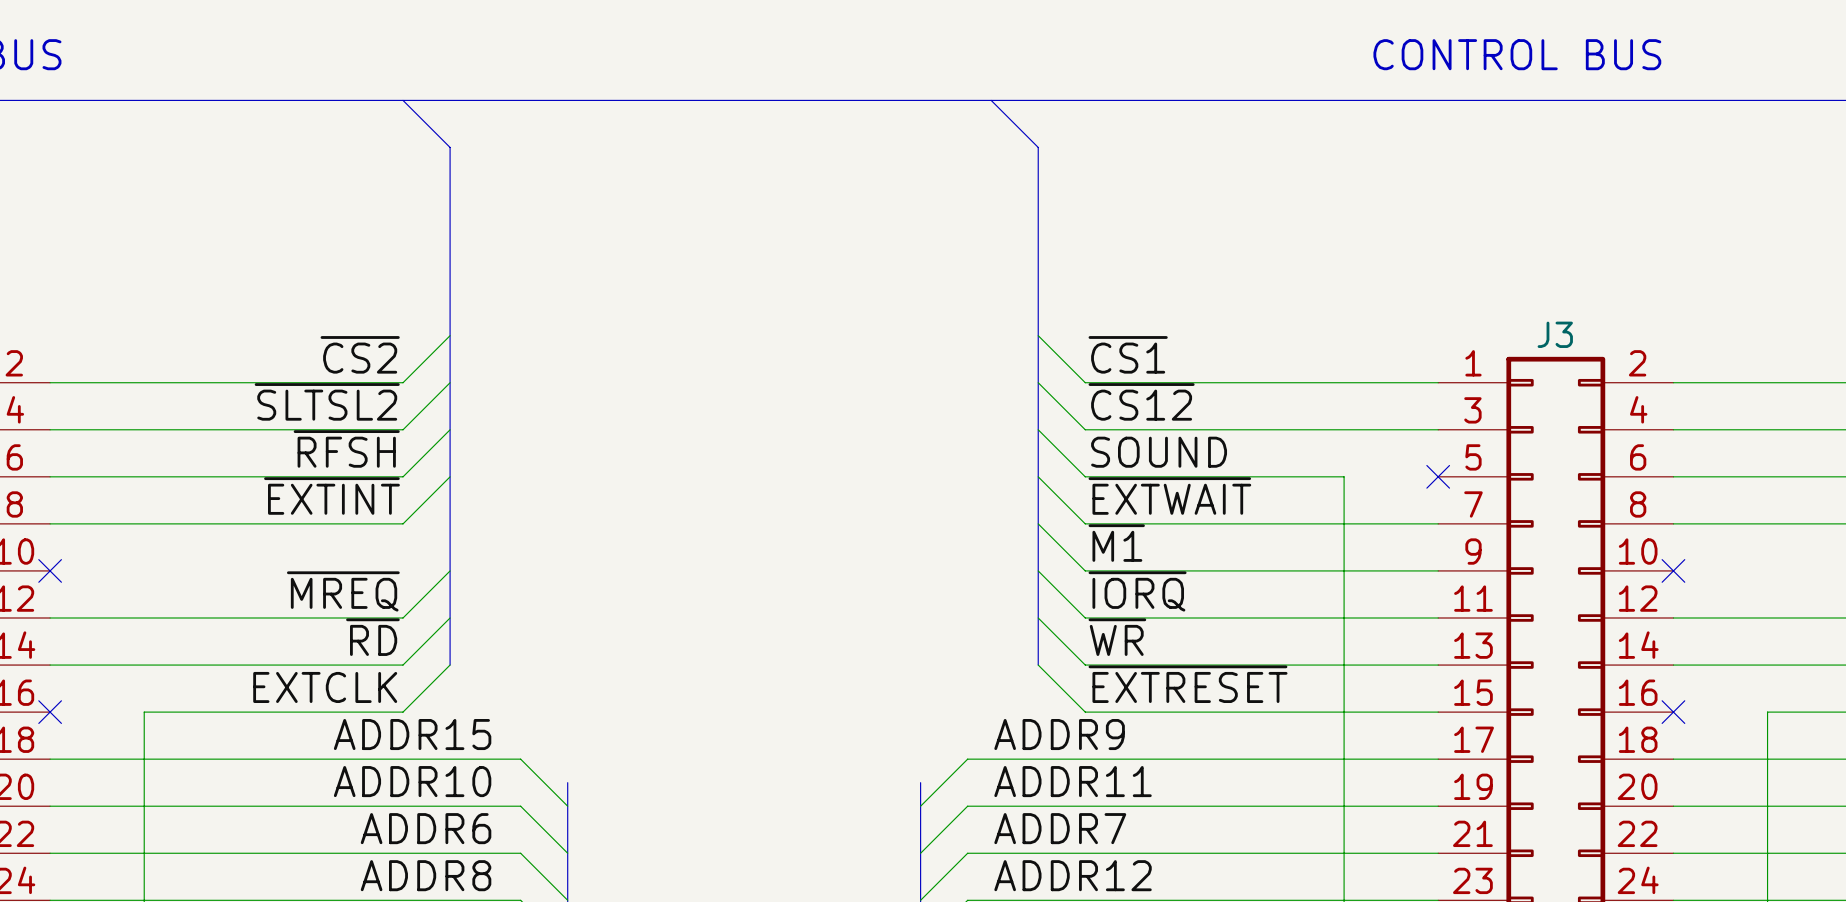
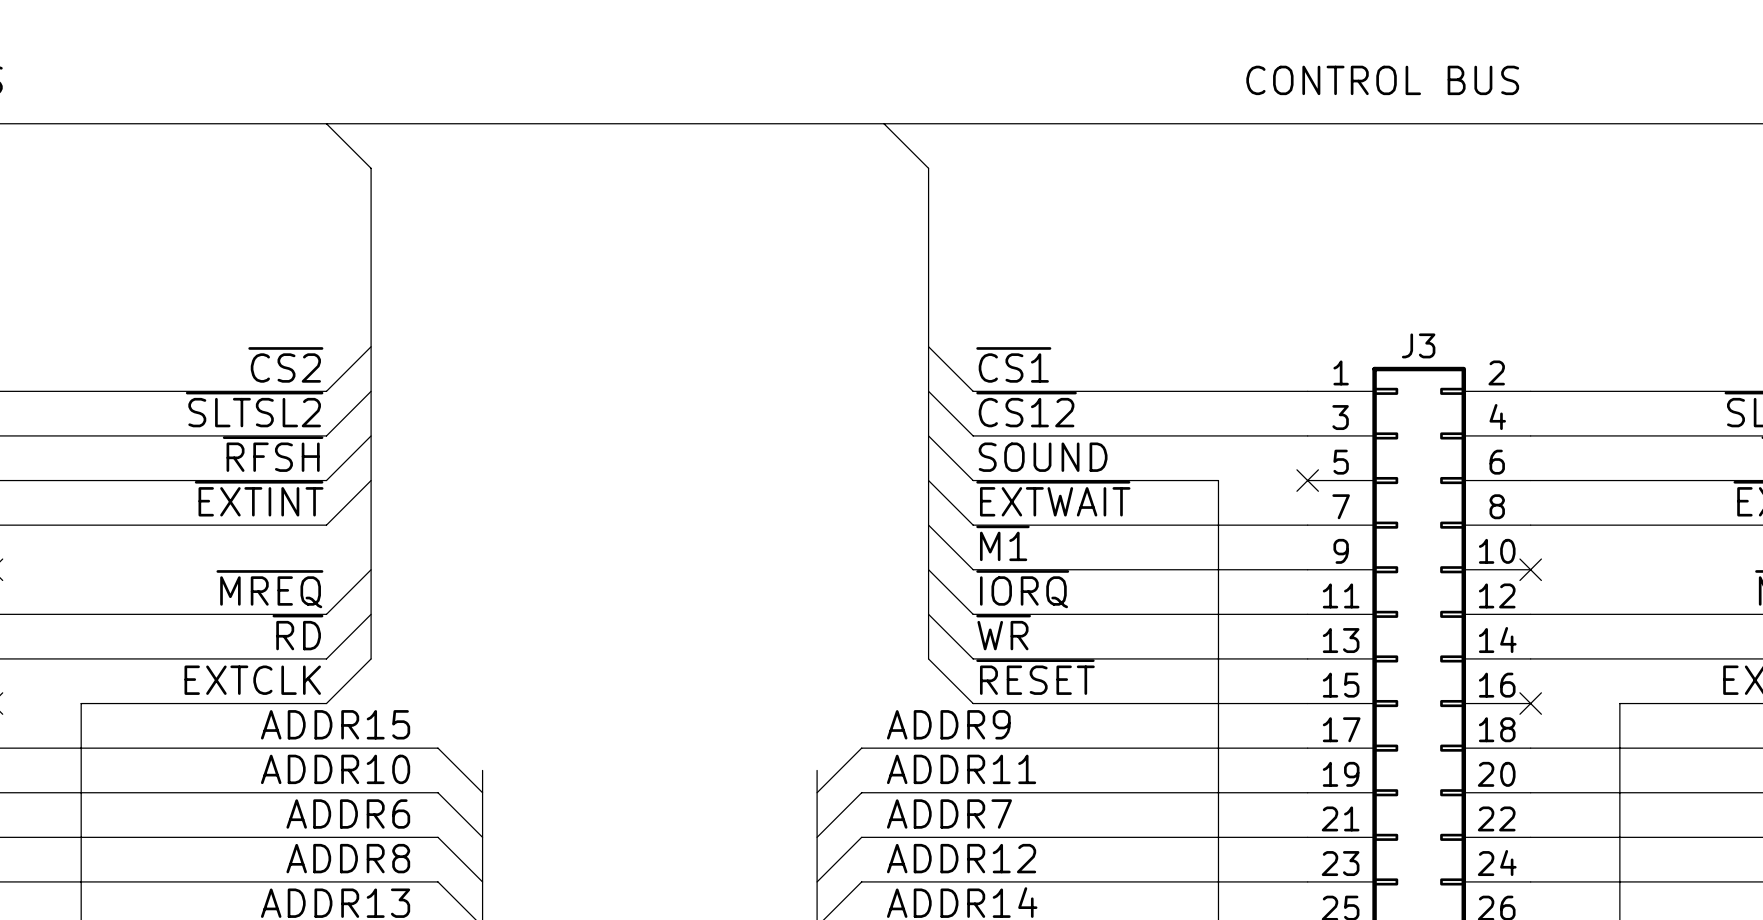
label: ~{EXTRESET} (1188, 684) -> ~{RESET} (1035, 677)

